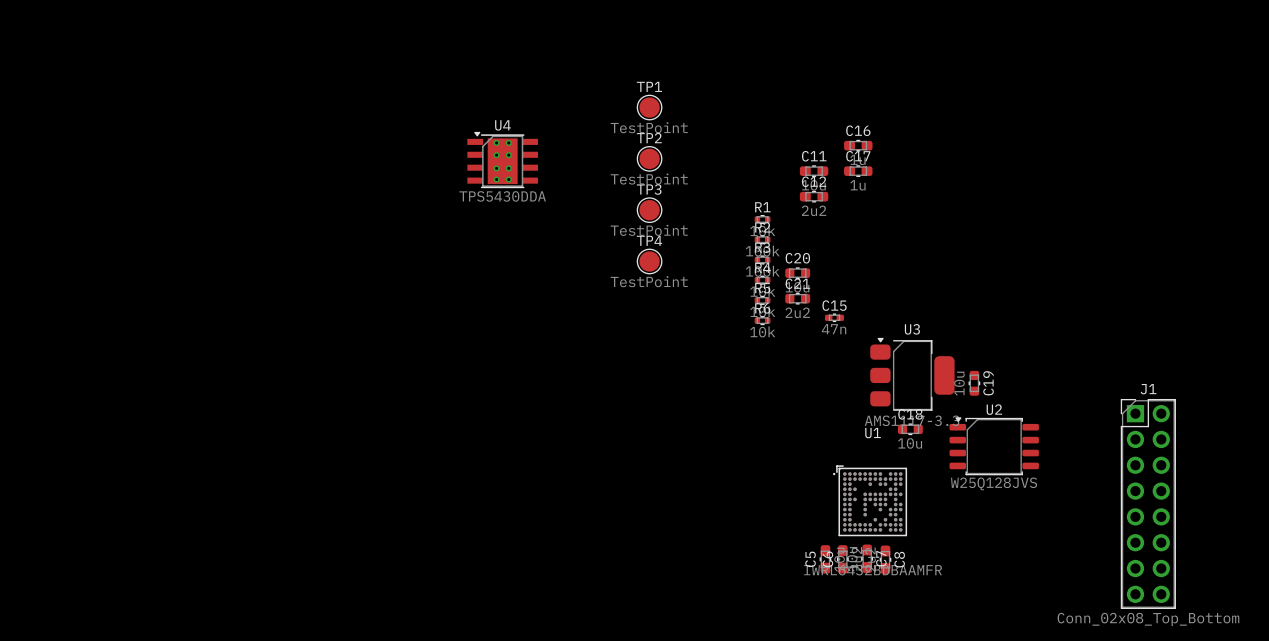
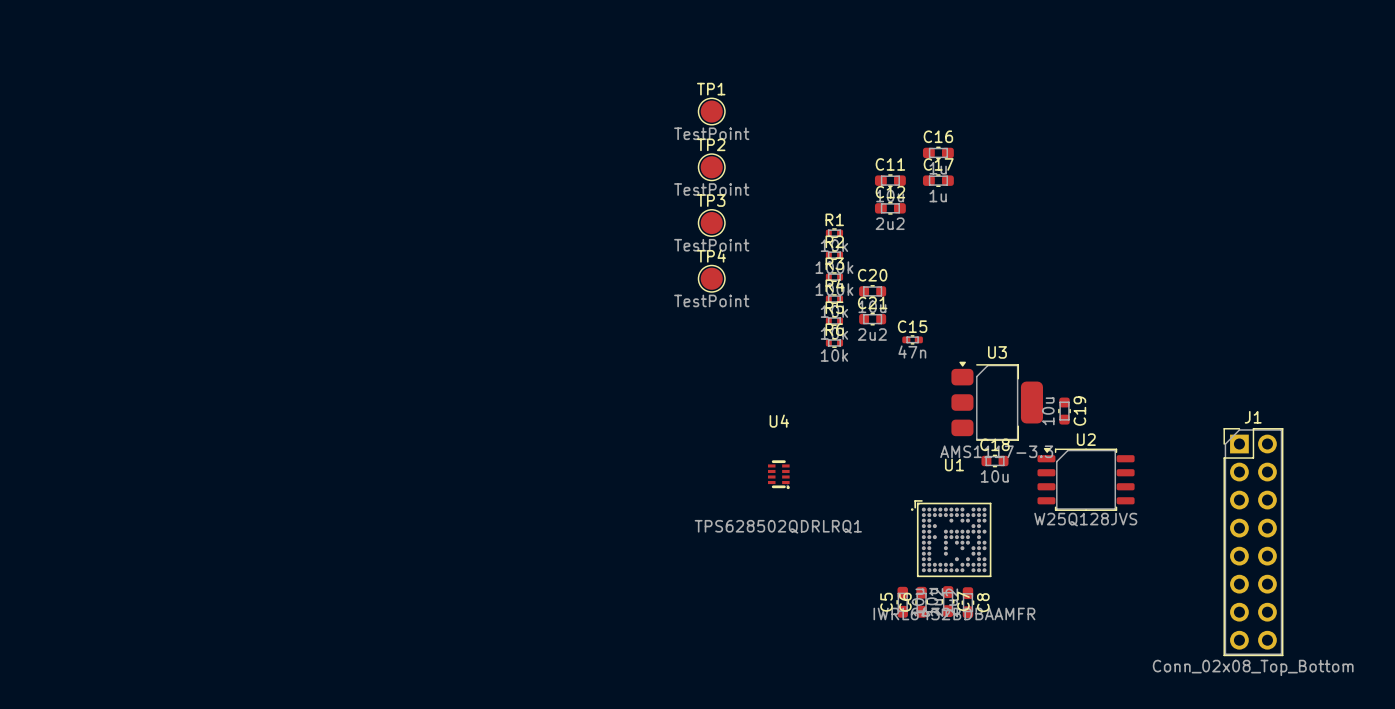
U4 footprint: [467, 131, 538, 189] -> [767, 460, 790, 490]
U4 value: TPS5430DDA (502, 196) -> TPS628502QDRLRQ1 (778, 526)

